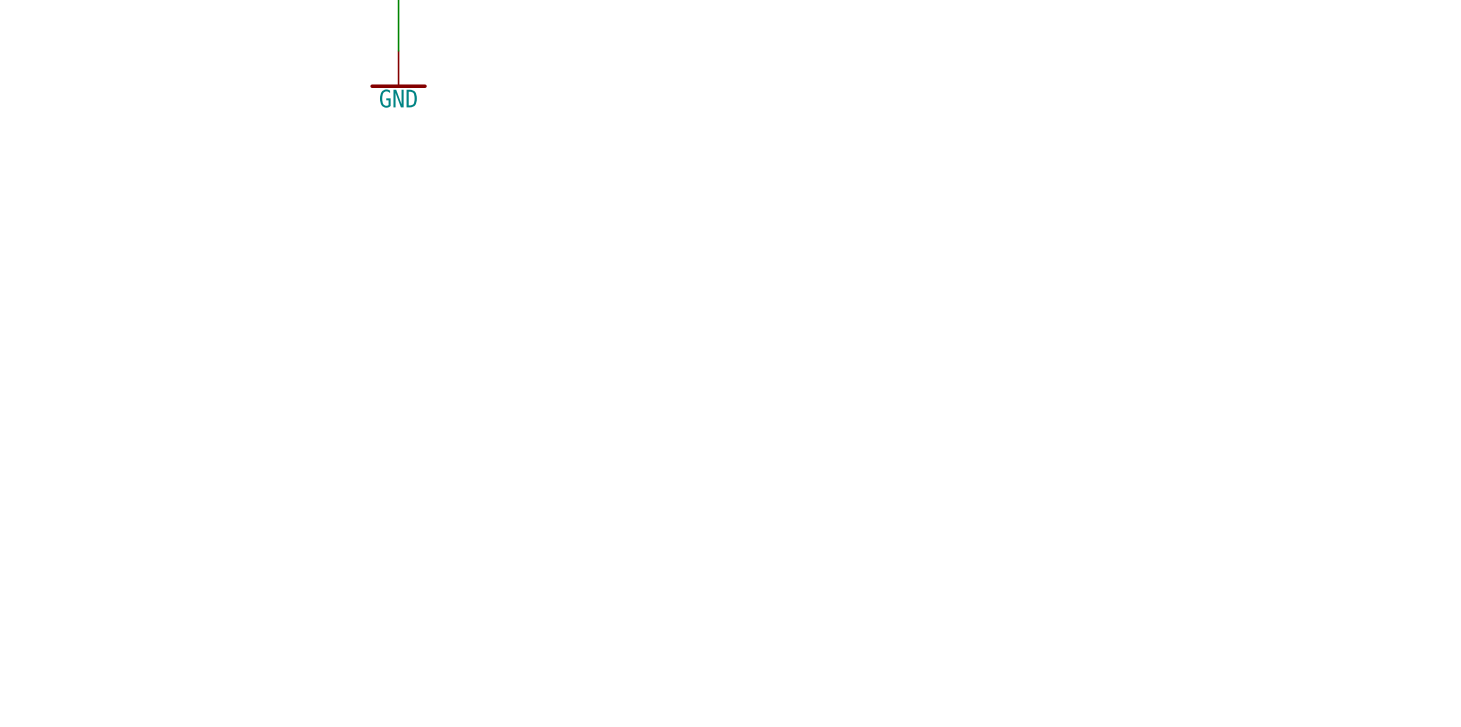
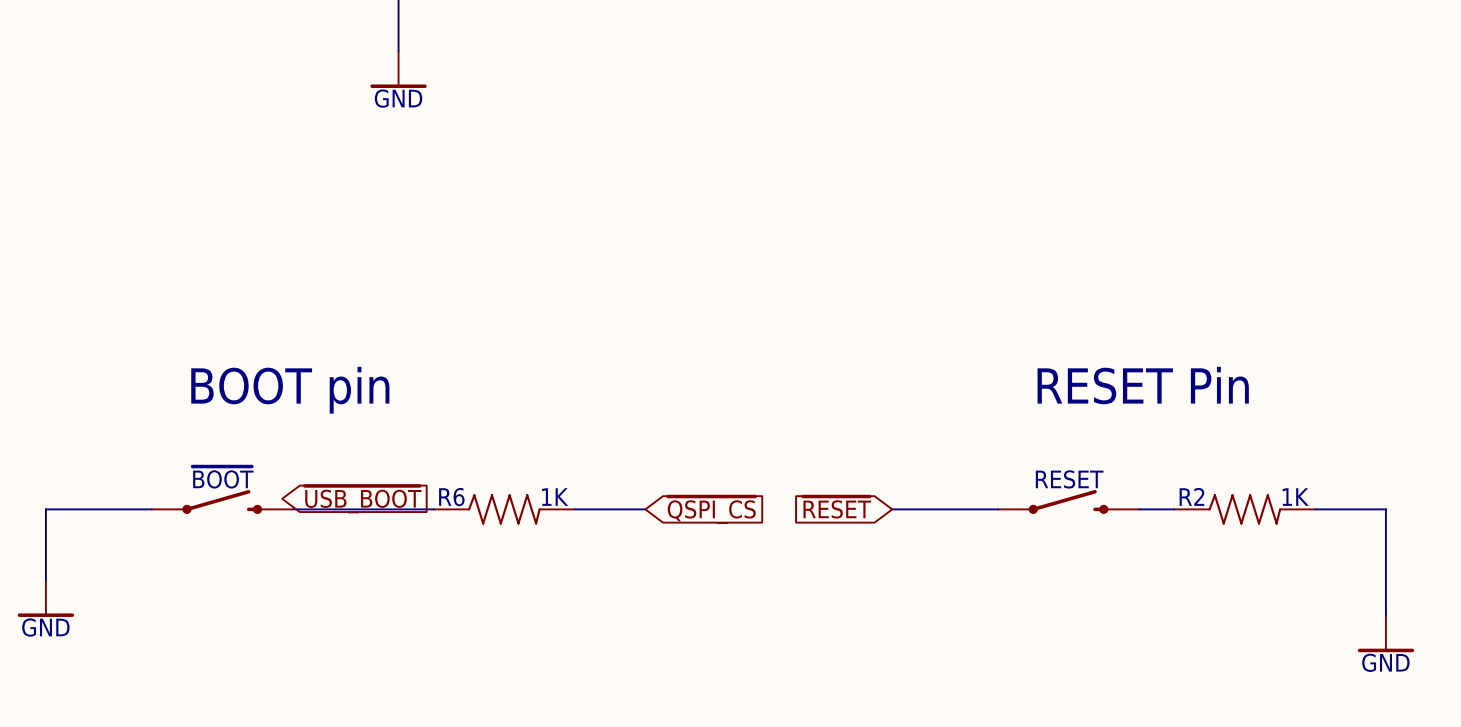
text: none -> RESET Pin (1143, 385)
text: none -> BOOT pin (290, 390)
global label: none -> ~{USB_BOOT} (363, 499)
~{BOOT}: none -> (222, 501)
RESET: none -> (1068, 501)
global label: none -> ~{RESET} (837, 507)
wire: none -> (151, 509) (45, 509) (45, 579)
wire: none -> (292, 509) (433, 509)
R6: none -> 1K (504, 509)
wire: none -> (574, 509) (645, 509)
wire: none -> (892, 509) (998, 509)
wire: none -> (1139, 509) (1174, 509)
R2: none -> 1K (1244, 509)
wire: none -> (1315, 509) (1385, 509) (1385, 615)
global label: none -> ~{QSPI_CS} (711, 510)
power symbol: none -> GND (45, 598)
power symbol: none -> GND (1385, 633)

